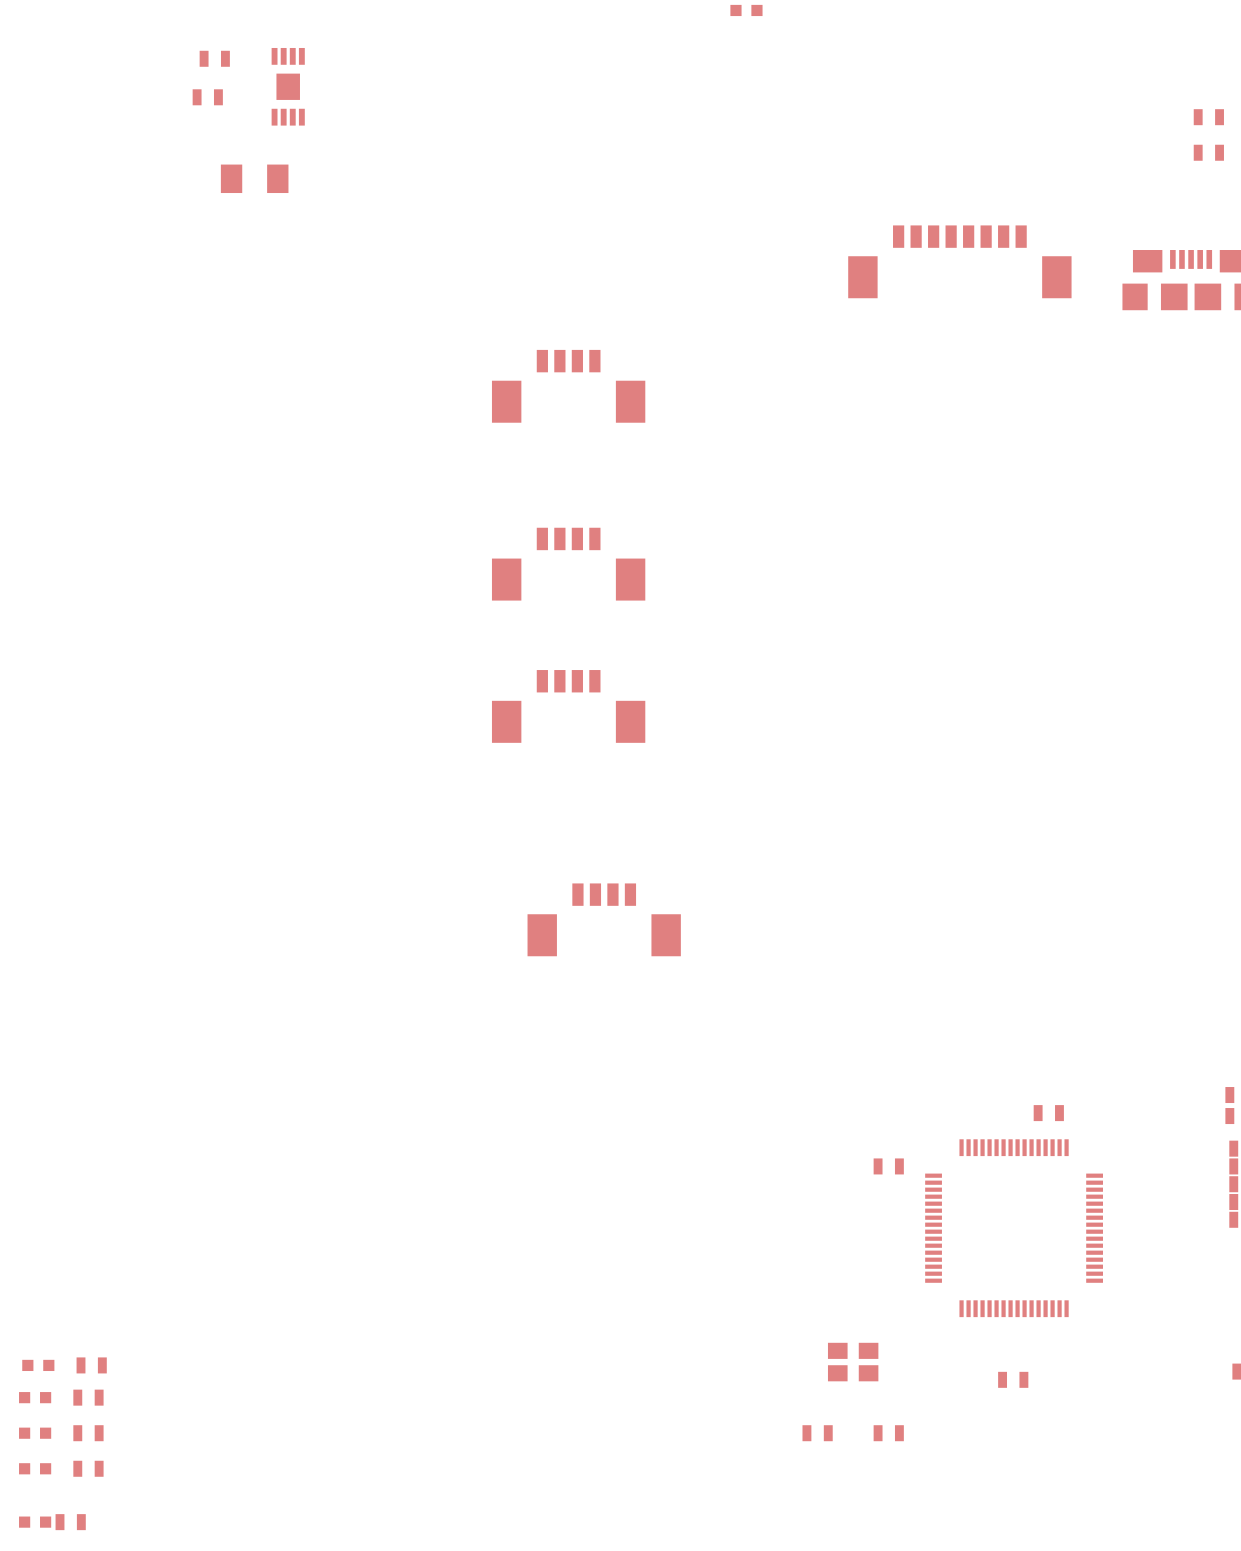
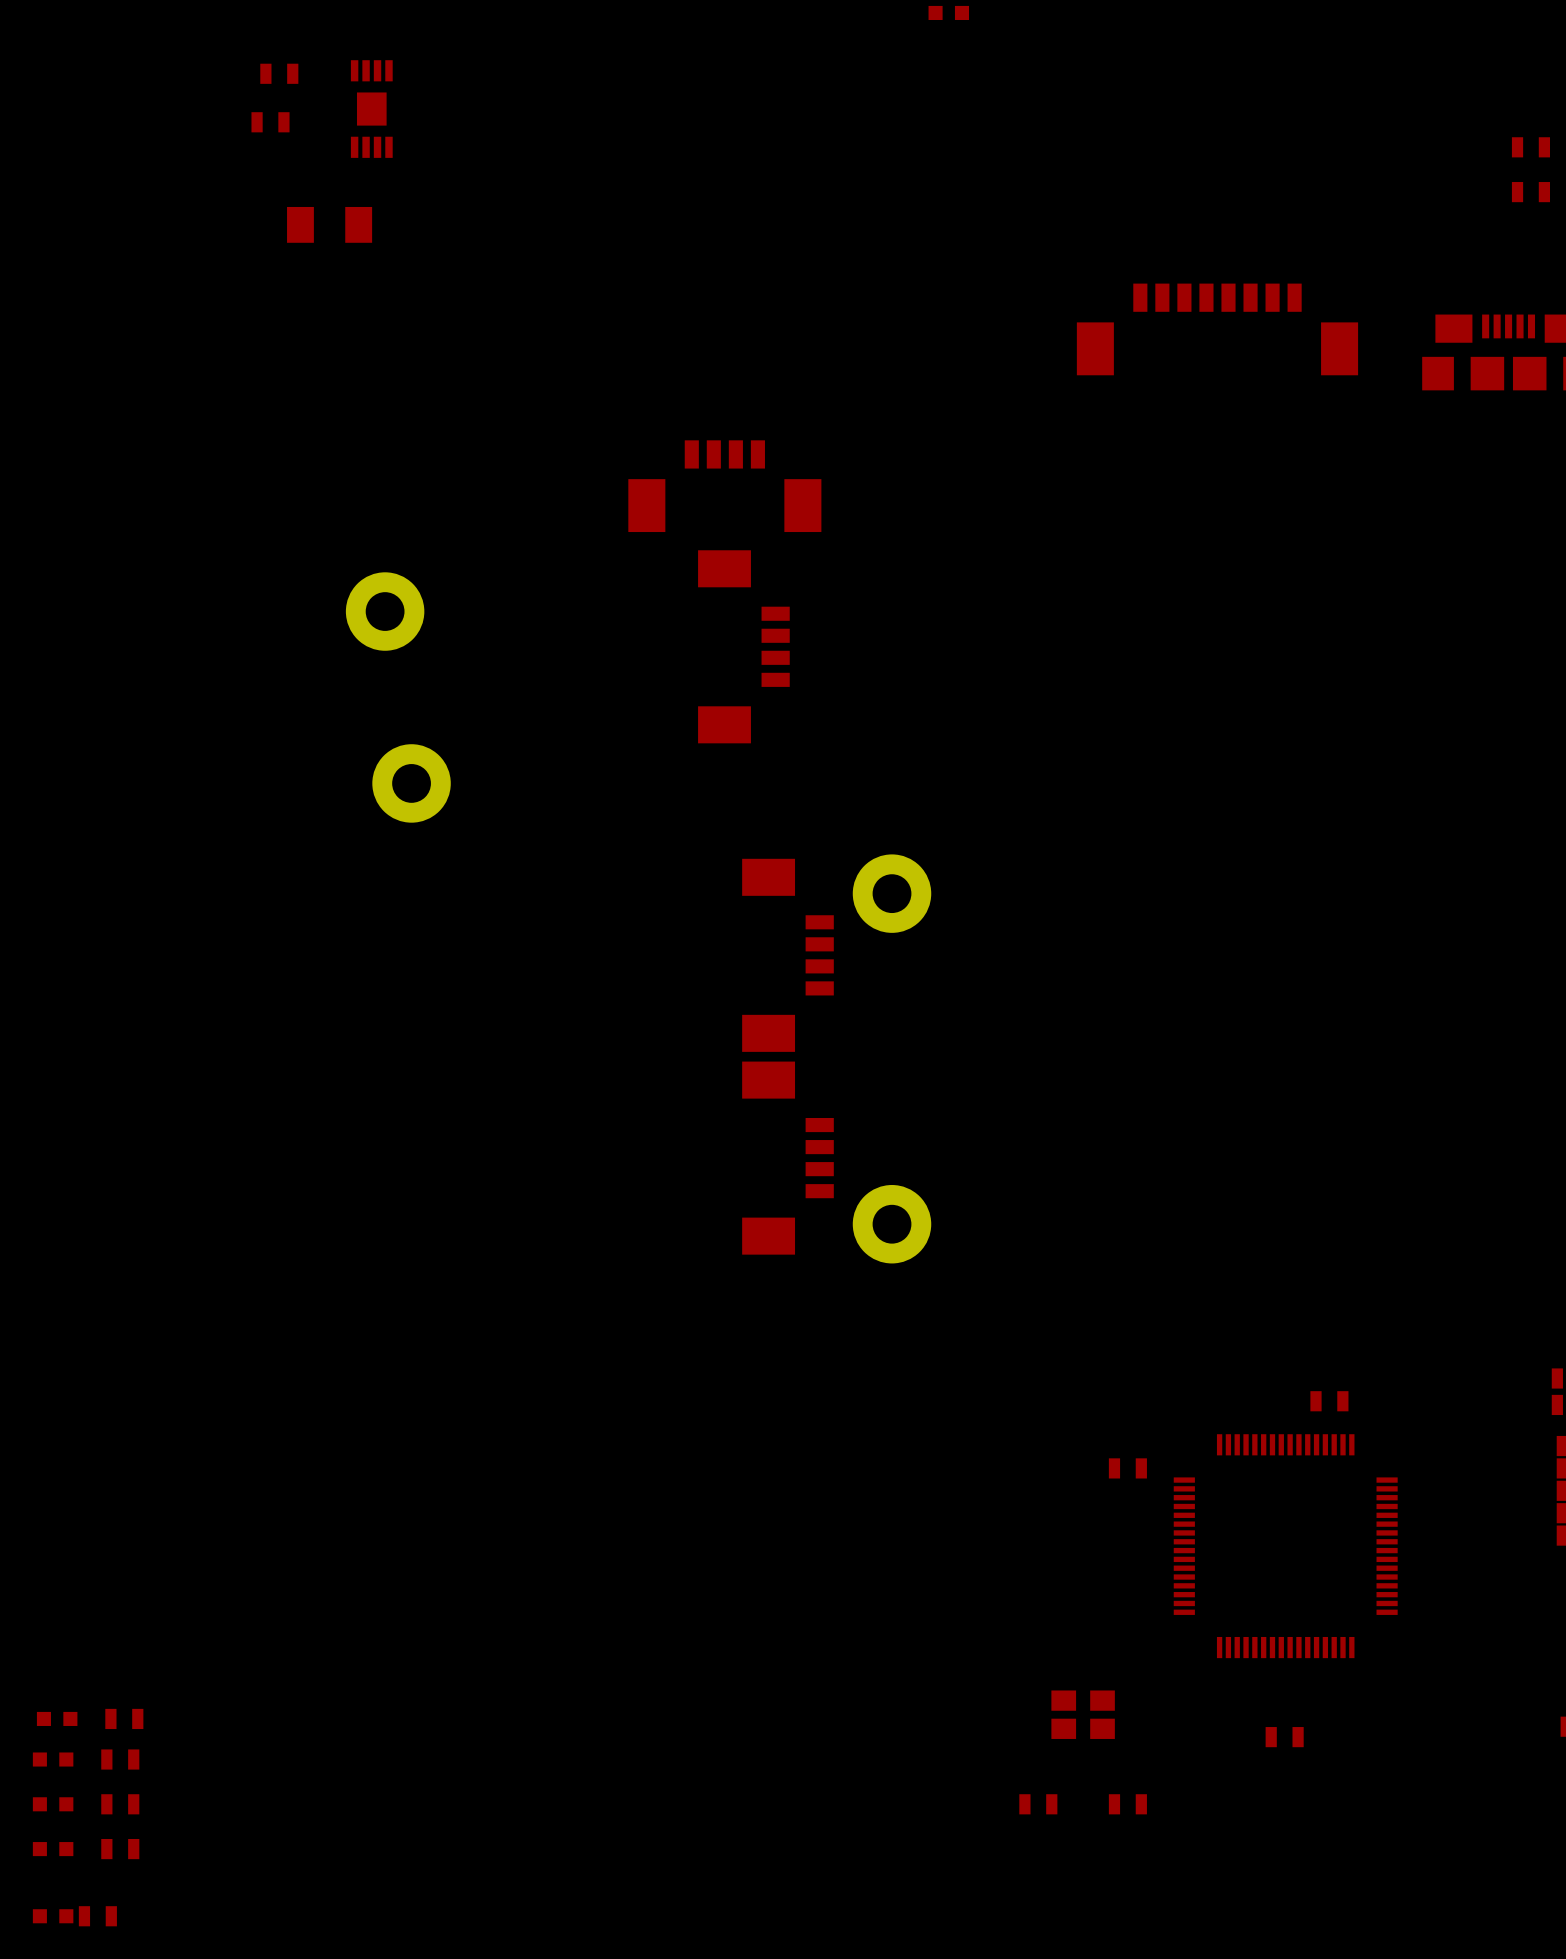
part: none -> (385, 611)
part rotation: 0° (568, 564) -> 90° clockwise (743, 646)
part: none -> (411, 783)
part rotation: 0° (568, 706) -> 90° clockwise (787, 955)
part: none -> (892, 893)
part rotation: 0° (604, 919) -> 90° clockwise (787, 1158)
part: none -> (892, 1224)

